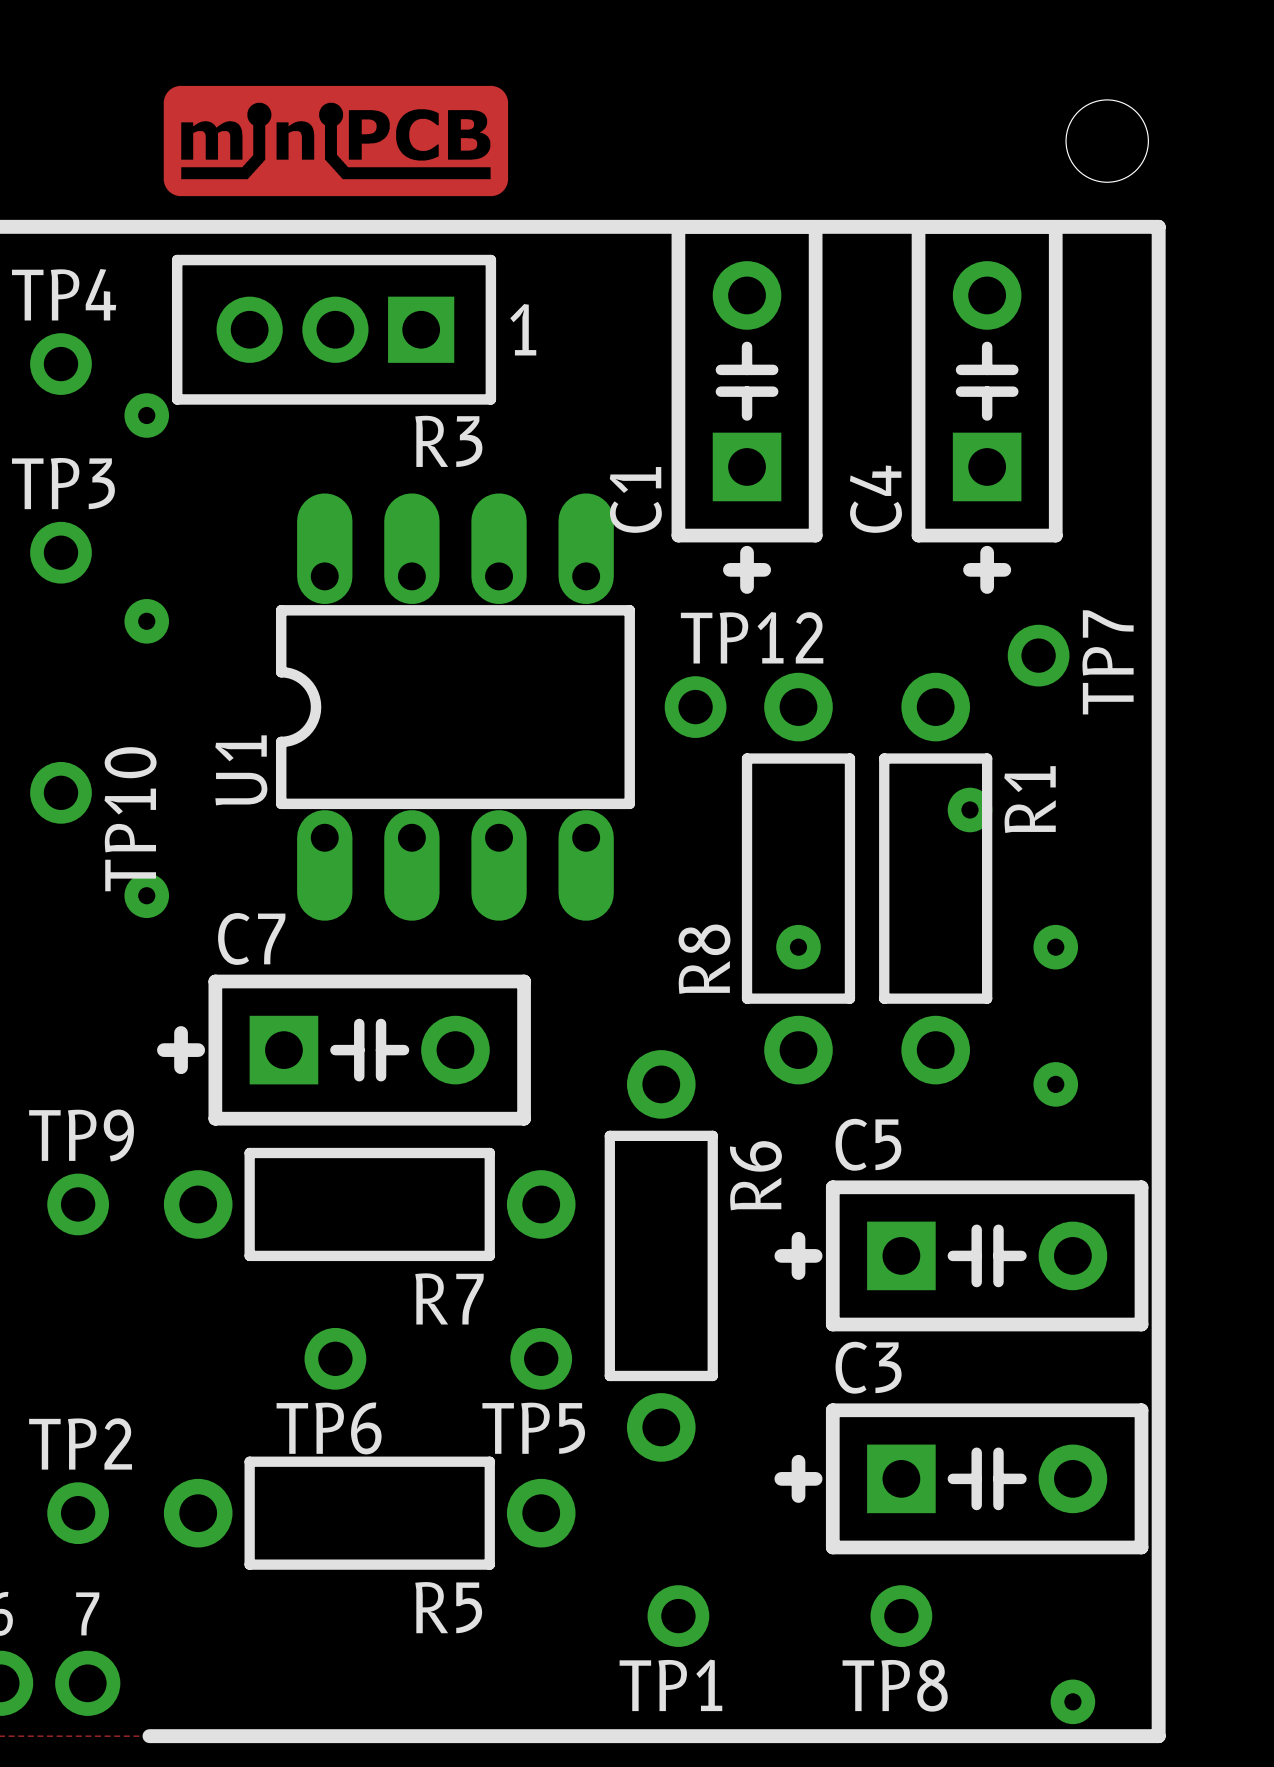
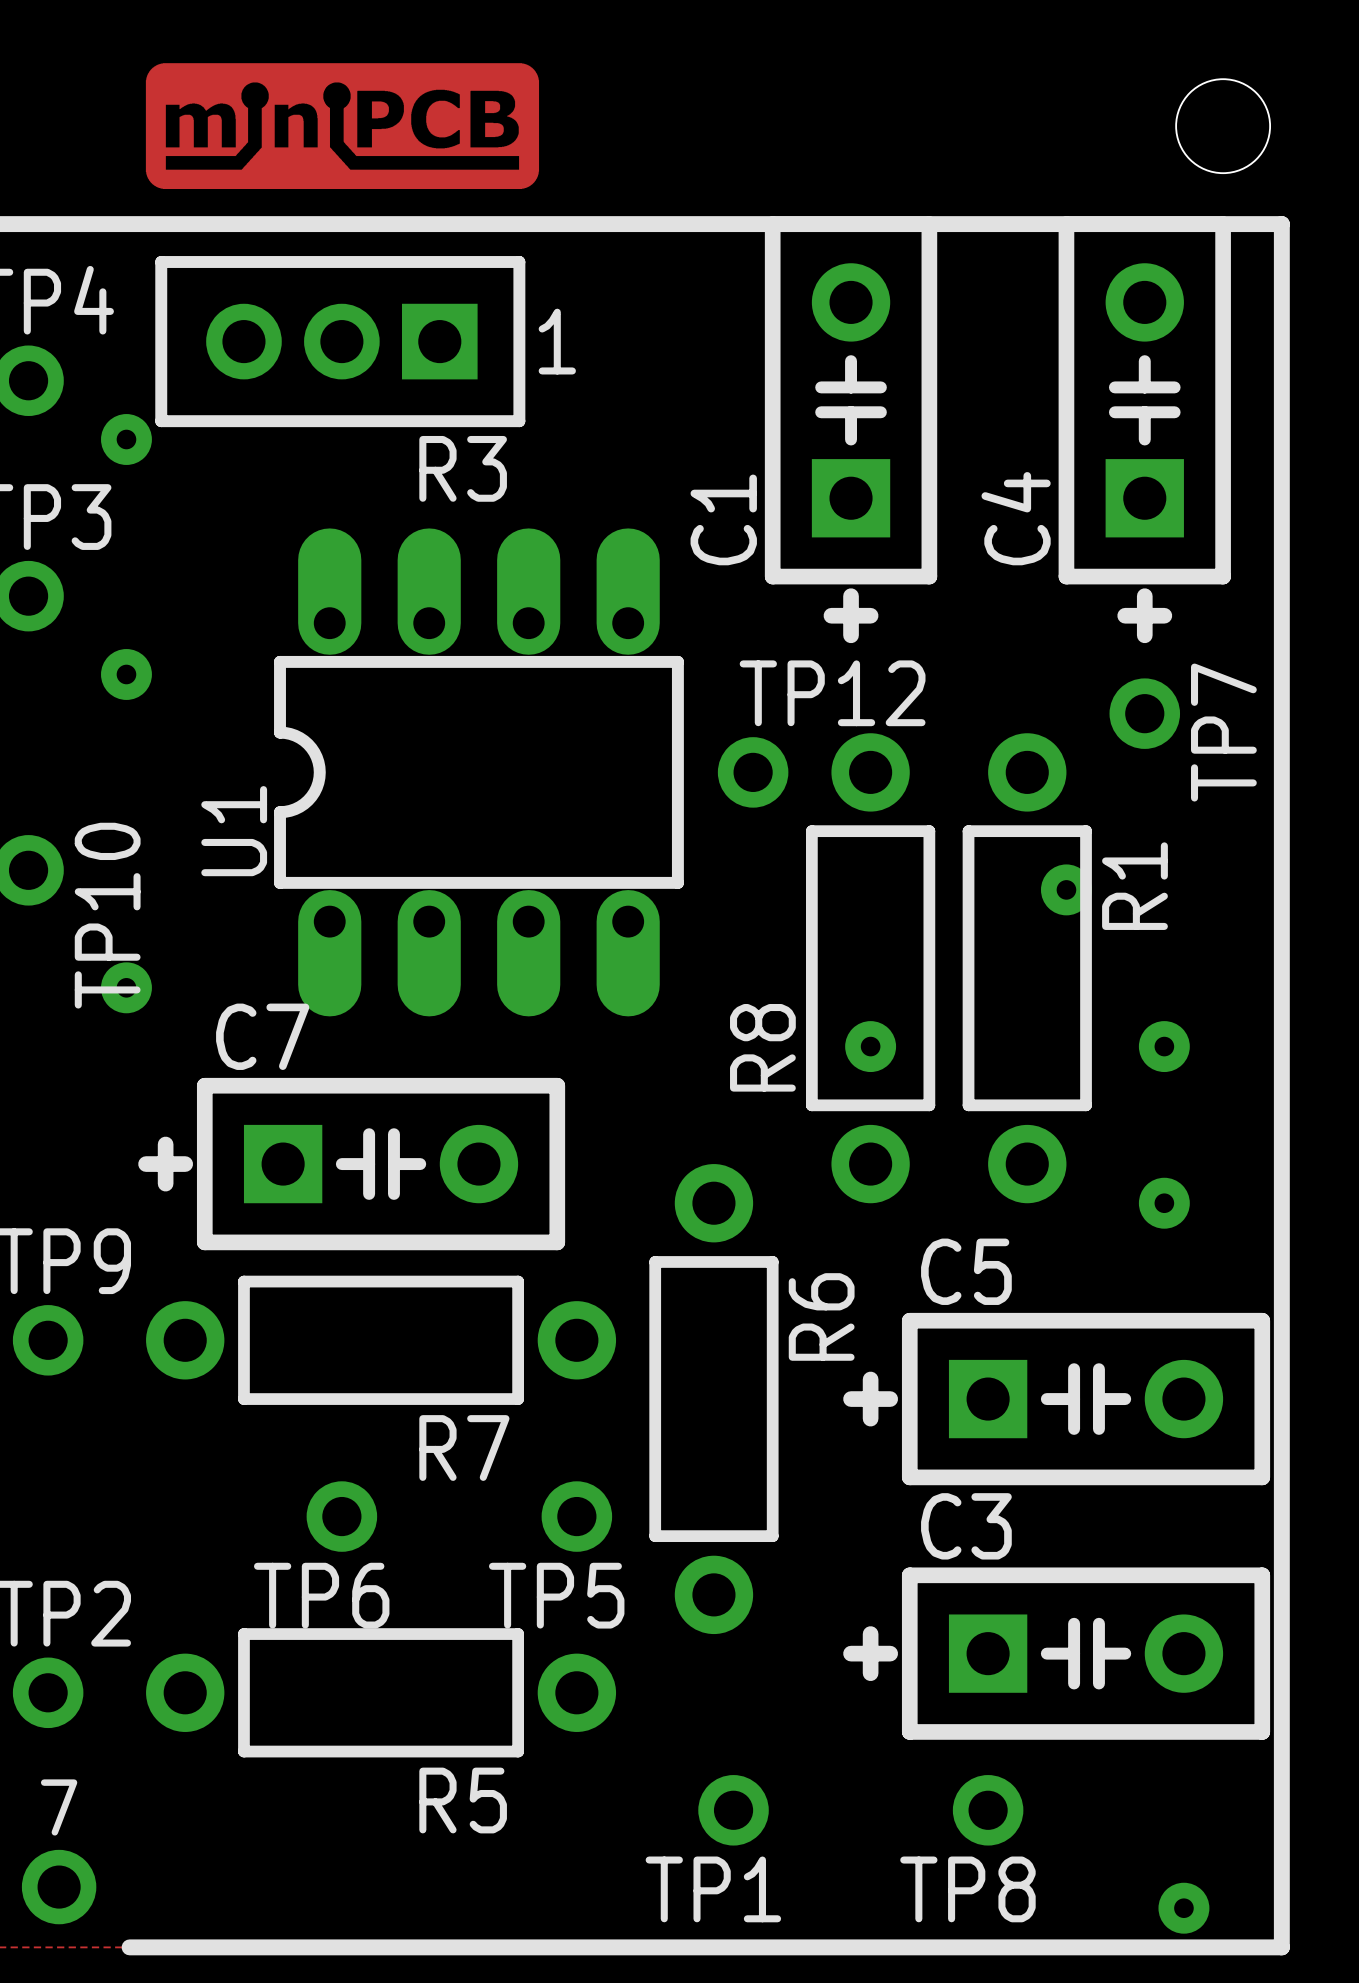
C1 position: (747, 406) -> (851, 429)
C4 position: (987, 406) -> (1144, 429)

